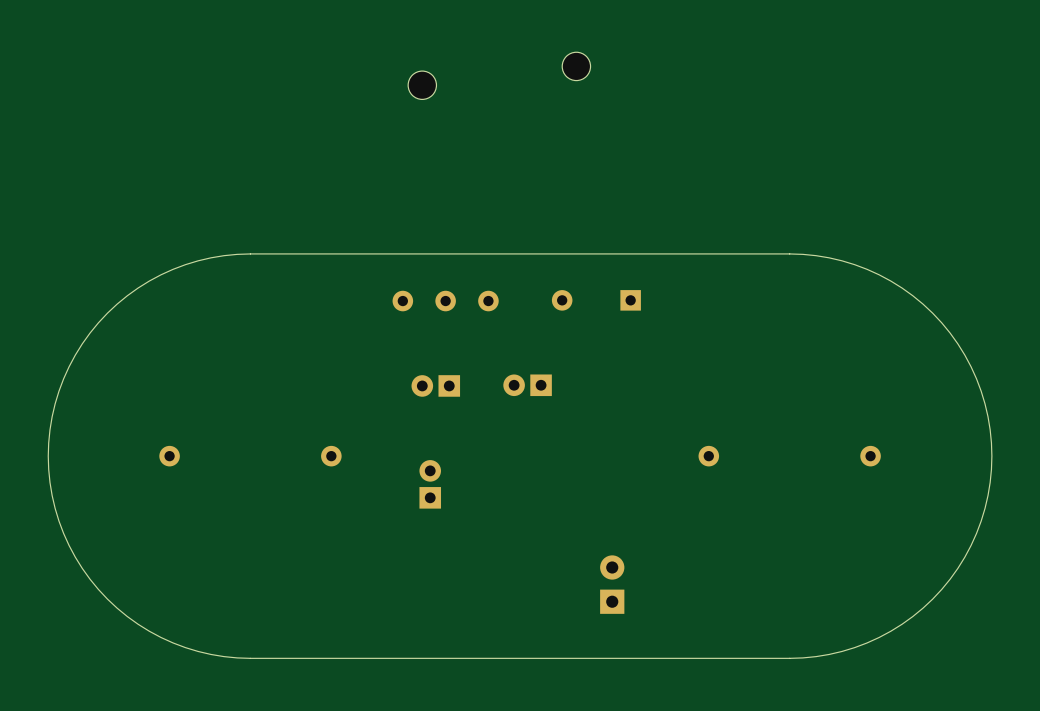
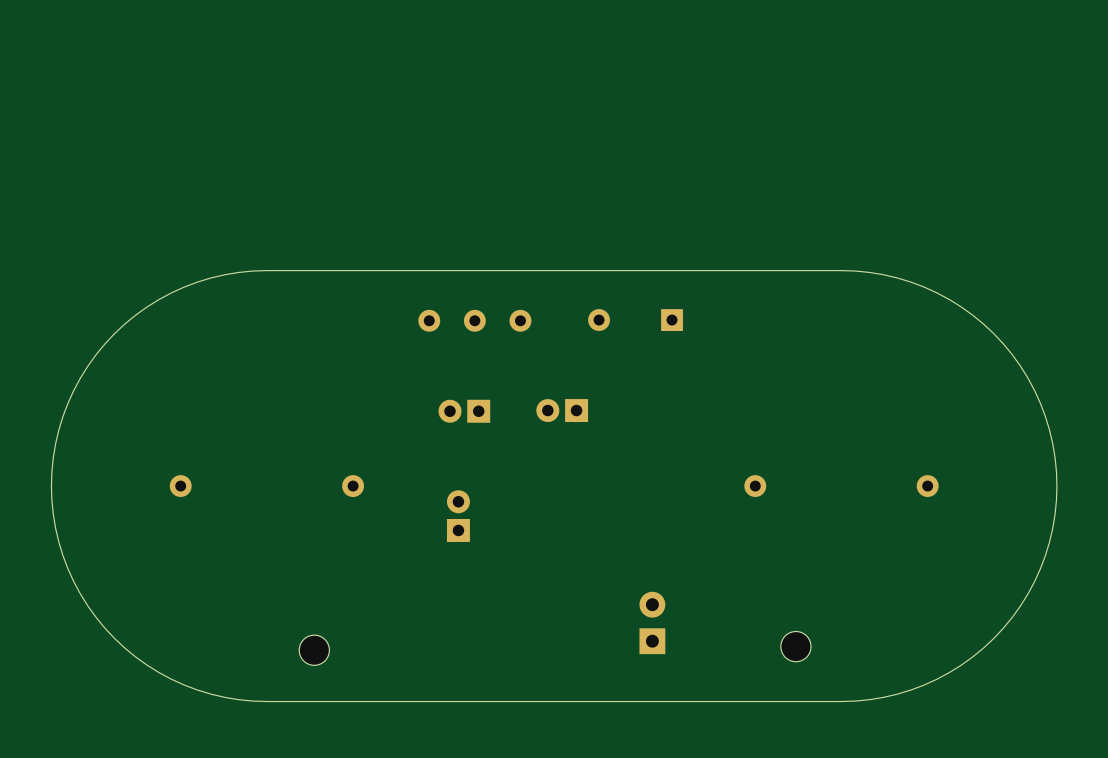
part: (576, 66) -> none
part: (422, 85) -> none
part: none -> (795, 646)
part: none -> (314, 650)

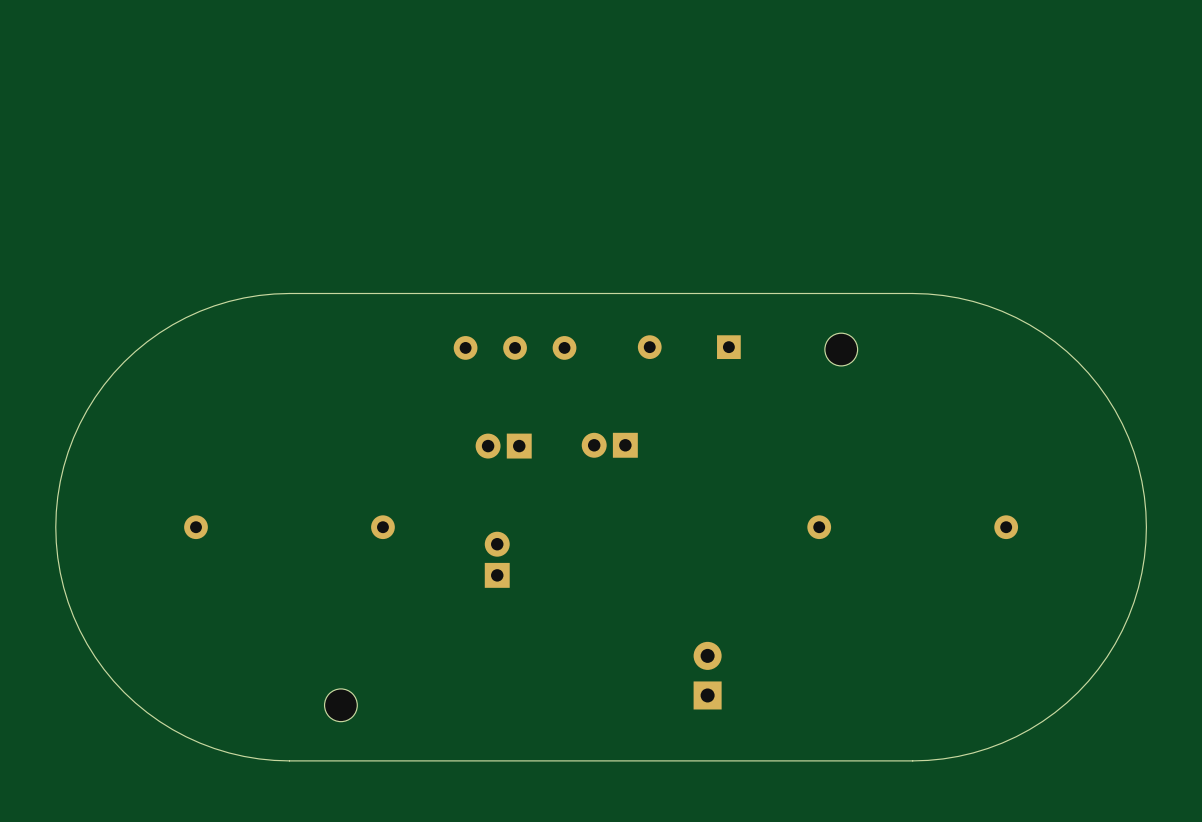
part position: (795, 646) -> (841, 349)

